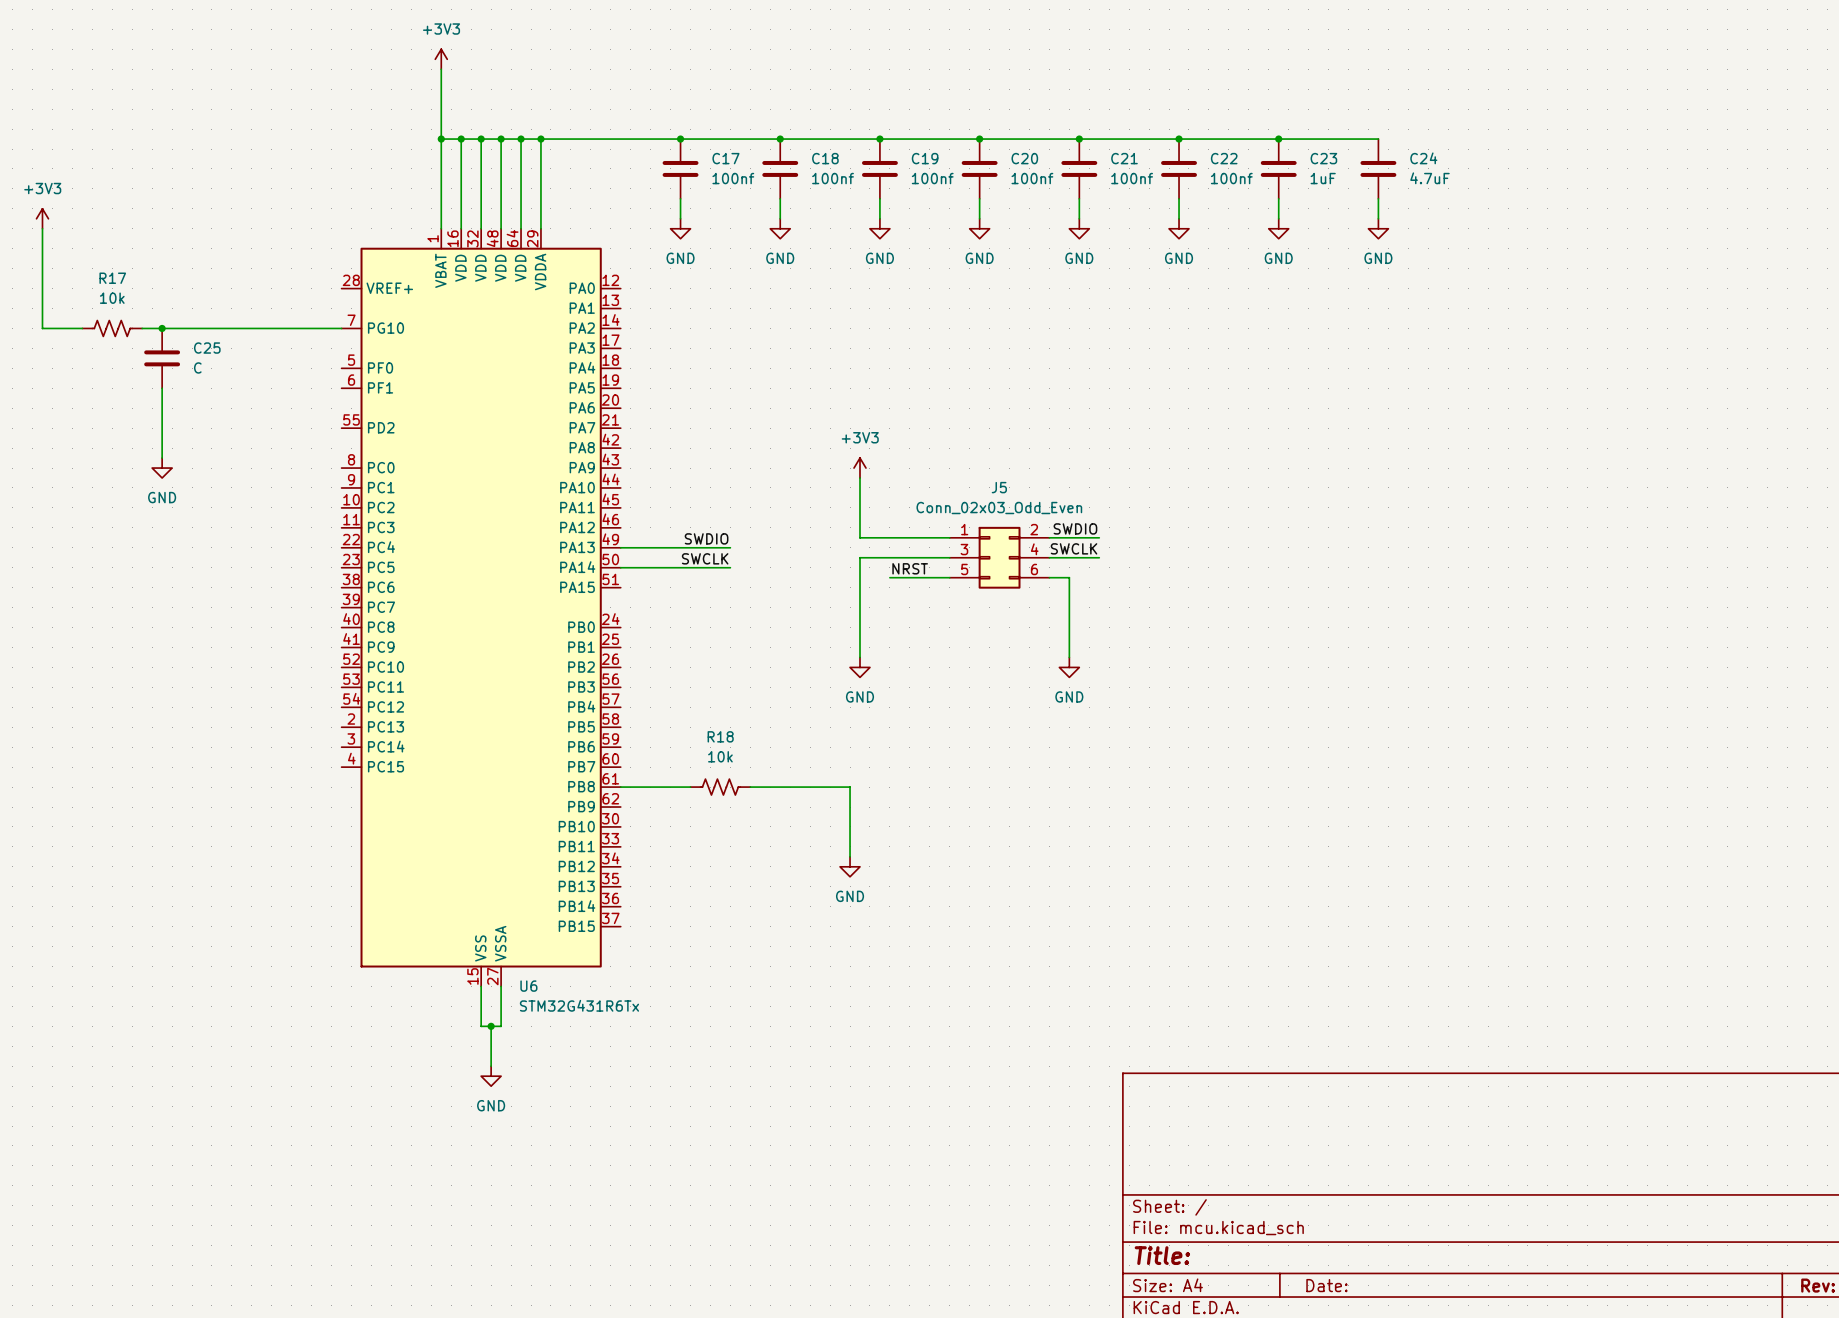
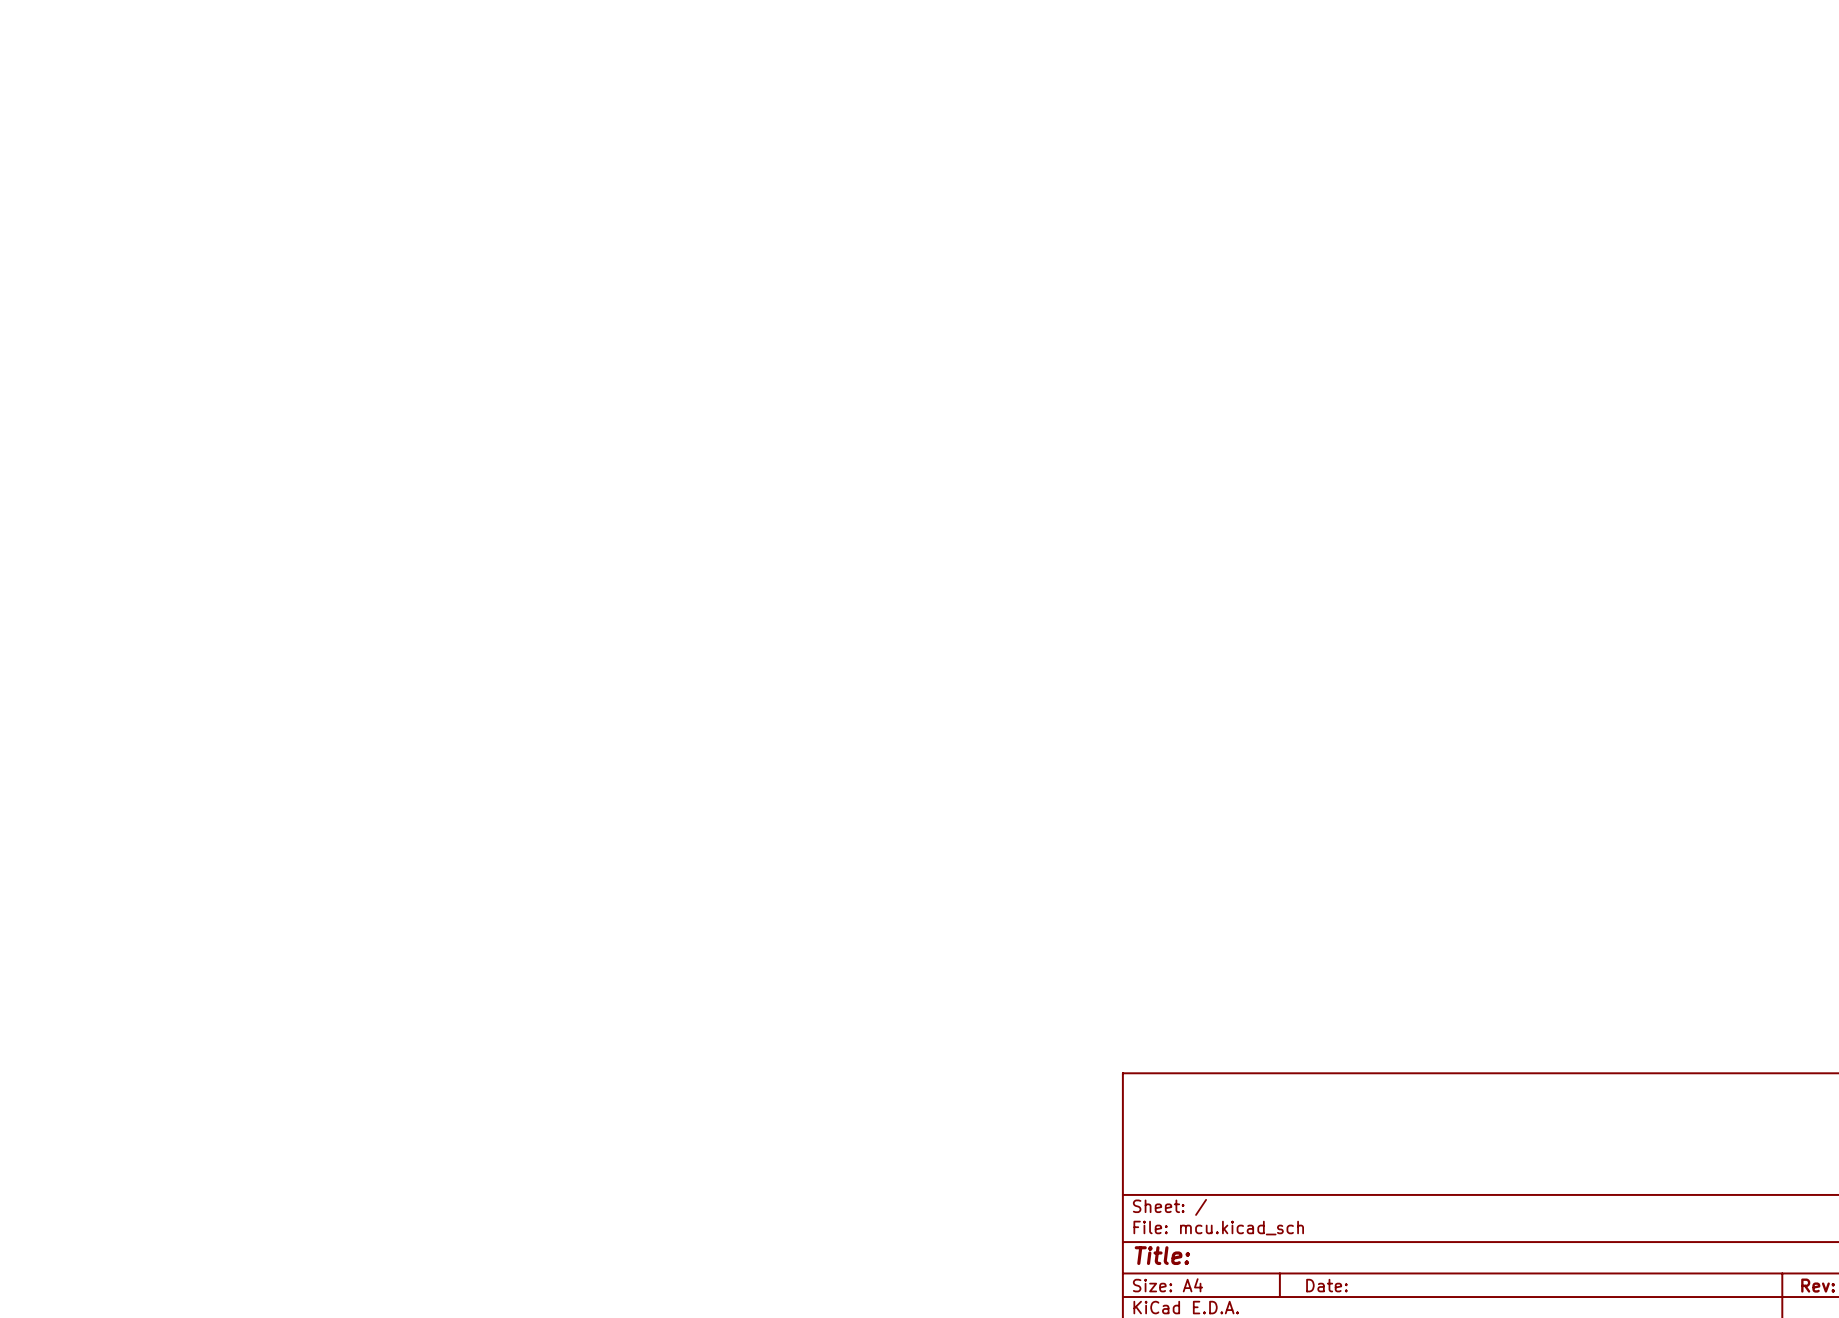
power symbol: +3V3 (441, 59) -> none
wire: (441, 69) (441, 228) -> none
wire: (441, 139) (1378, 139) -> none
junction: (441, 139) -> none
wire: (461, 139) (461, 228) -> none
junction: (461, 139) -> none
wire: (481, 139) (481, 228) -> none
junction: (481, 139) -> none
wire: (501, 139) (501, 228) -> none
junction: (501, 139) -> none
wire: (521, 139) (521, 228) -> none
junction: (521, 139) -> none
wire: (540, 139) (540, 228) -> none
junction: (540, 139) -> none
junction: (680, 139) -> none
junction: (780, 139) -> none
junction: (879, 139) -> none
junction: (979, 139) -> none
junction: (1079, 139) -> none
junction: (1179, 139) -> none
junction: (1278, 139) -> none
C17: 100nf (680, 168) -> none
C18: 100nf (780, 168) -> none
C19: 100nf (879, 168) -> none
C20: 100nf (979, 168) -> none
C21: 100nf (1079, 168) -> none
C22: 100nf (1179, 168) -> none
C23: 1uF (1278, 168) -> none
C24: 4.7uF (1378, 168) -> none
wire: (680, 198) (680, 218) -> none
wire: (780, 198) (780, 218) -> none
wire: (879, 198) (879, 218) -> none
wire: (979, 198) (979, 218) -> none
wire: (1079, 198) (1079, 218) -> none
wire: (1179, 198) (1179, 218) -> none
wire: (1278, 198) (1278, 218) -> none
wire: (1378, 198) (1378, 218) -> none
power symbol: +3V3 (42, 218) -> none
wire: (42, 228) (42, 328) (82, 328) -> none
power symbol: GND (680, 228) -> none
power symbol: GND (780, 228) -> none
power symbol: GND (879, 228) -> none
power symbol: GND (979, 228) -> none
power symbol: GND (1079, 228) -> none
power symbol: GND (1179, 228) -> none
power symbol: GND (1278, 228) -> none
power symbol: GND (1378, 228) -> none
R17: 10k (112, 328) -> none
wire: (142, 328) (341, 328) -> none
junction: (162, 328) -> none
C25: C (162, 358) -> none
wire: (162, 388) (162, 458) -> none
power symbol: GND (162, 468) -> none
power symbol: +3V3 (859, 468) -> none
wire: (859, 478) (859, 537) (949, 537) -> none
label: SWDIO (1075, 528) -> none
wire: (1049, 537) (1099, 537) -> none
label: SWDIO (706, 538) -> none
wire: (620, 547) (730, 547) -> none
label: SWCLK (1074, 548) -> none
wire: (949, 557) (859, 557) (859, 657) -> none
J5: Conn_02x03_Odd_Even (999, 557) -> none
wire: (1049, 557) (1099, 557) -> none
label: SWCLK (705, 558) -> none
wire: (620, 567) (730, 567) -> none
label: NRST (910, 568) -> none
wire: (889, 577) (949, 577) -> none
wire: (1049, 577) (1069, 577) (1069, 657) -> none
U6: STM32G431R6Tx (481, 607) -> none
power symbol: GND (859, 667) -> none
power symbol: GND (1069, 667) -> none
wire: (620, 787) (690, 787) -> none
R18: 10k (720, 787) -> none
wire: (750, 787) (850, 787) (850, 856) -> none
power symbol: GND (850, 866) -> none
wire: (481, 986) (481, 1026) (501, 1026) (501, 986) -> none
wire: (491, 1026) (491, 1066) -> none
junction: (491, 1026) -> none
power symbol: GND (491, 1076) -> none

